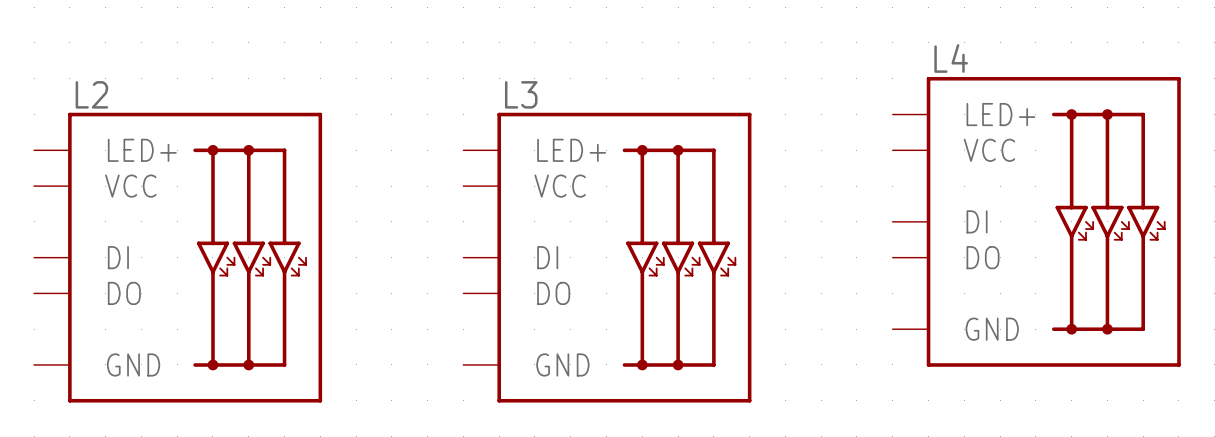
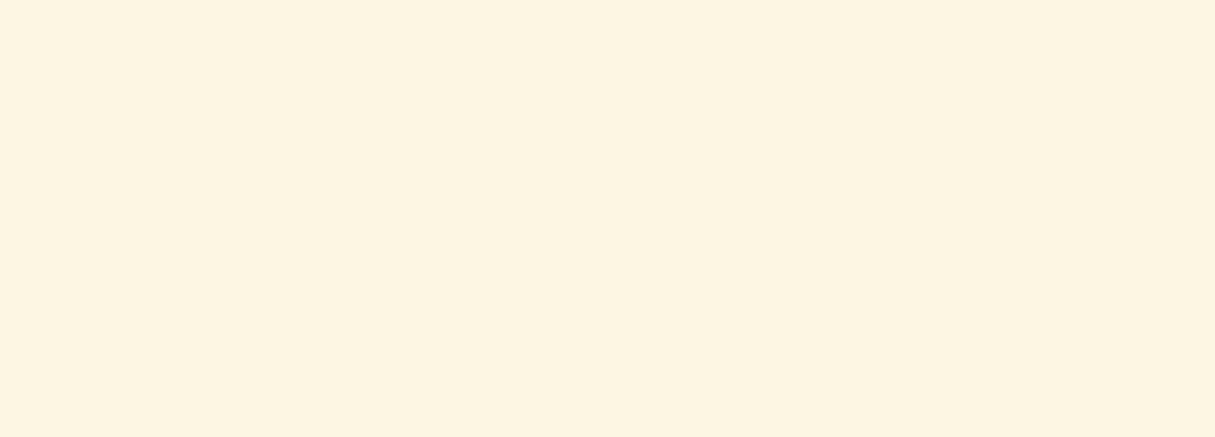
L4: (1036, 221) -> none
L2: (178, 257) -> none
L3: (607, 257) -> none

